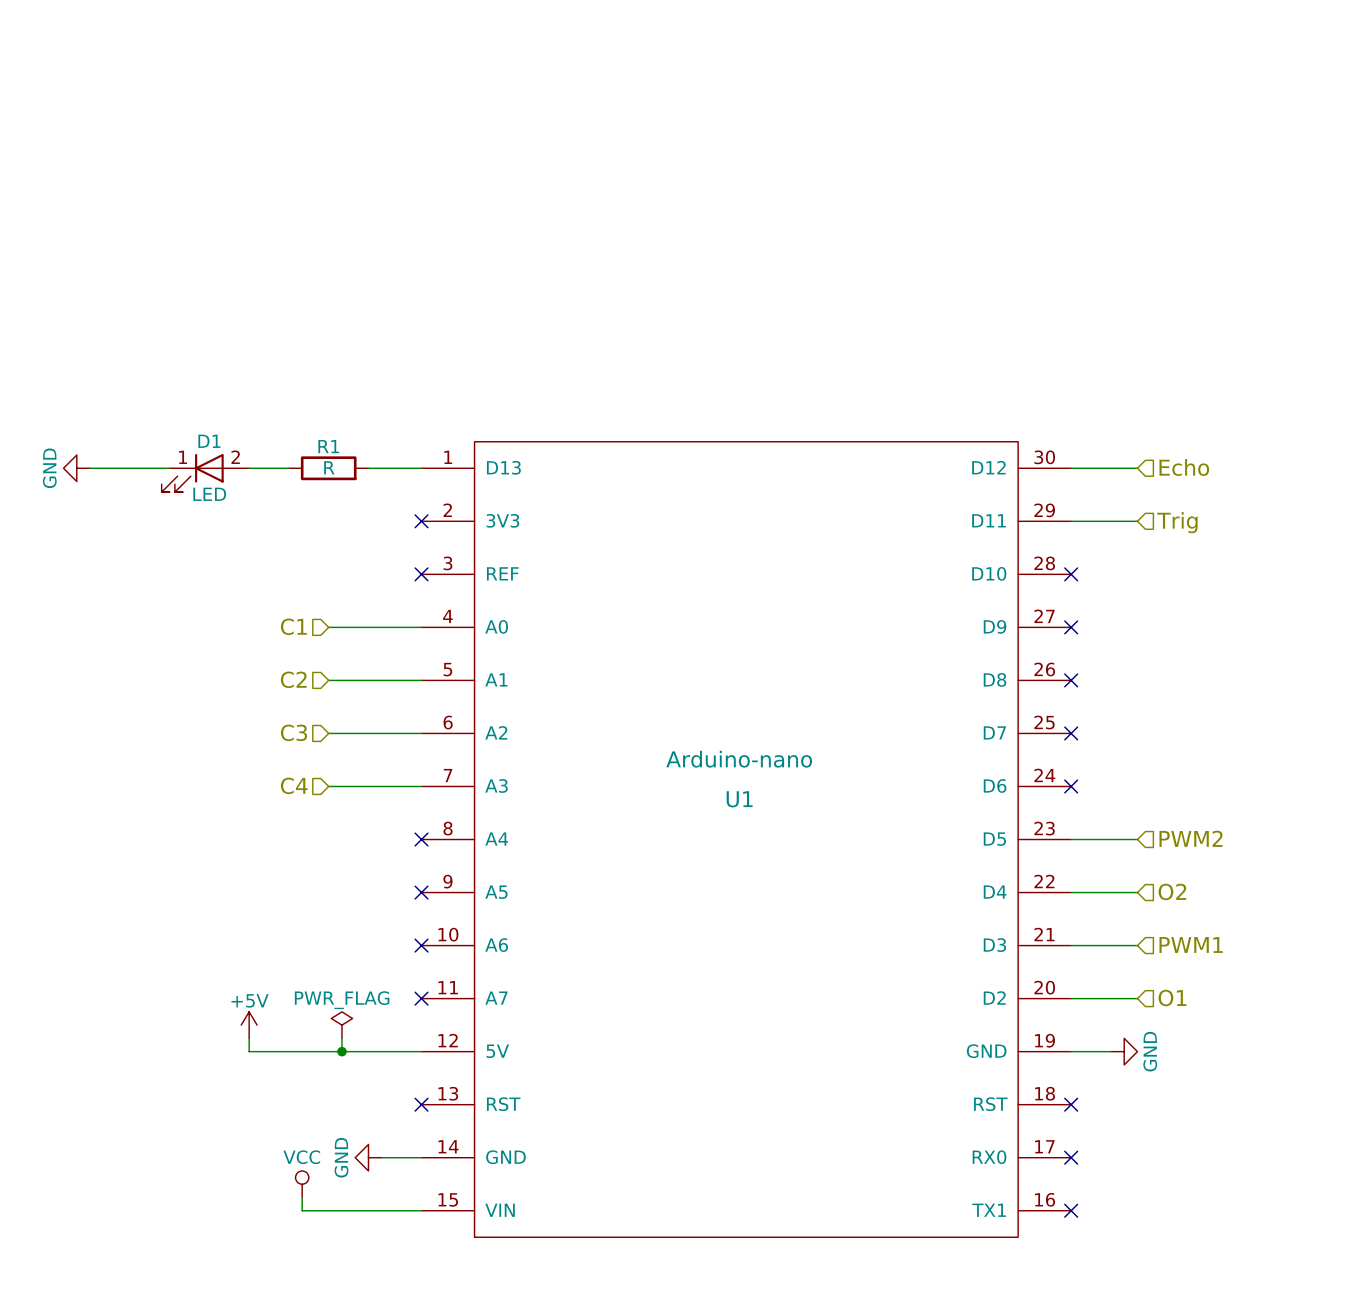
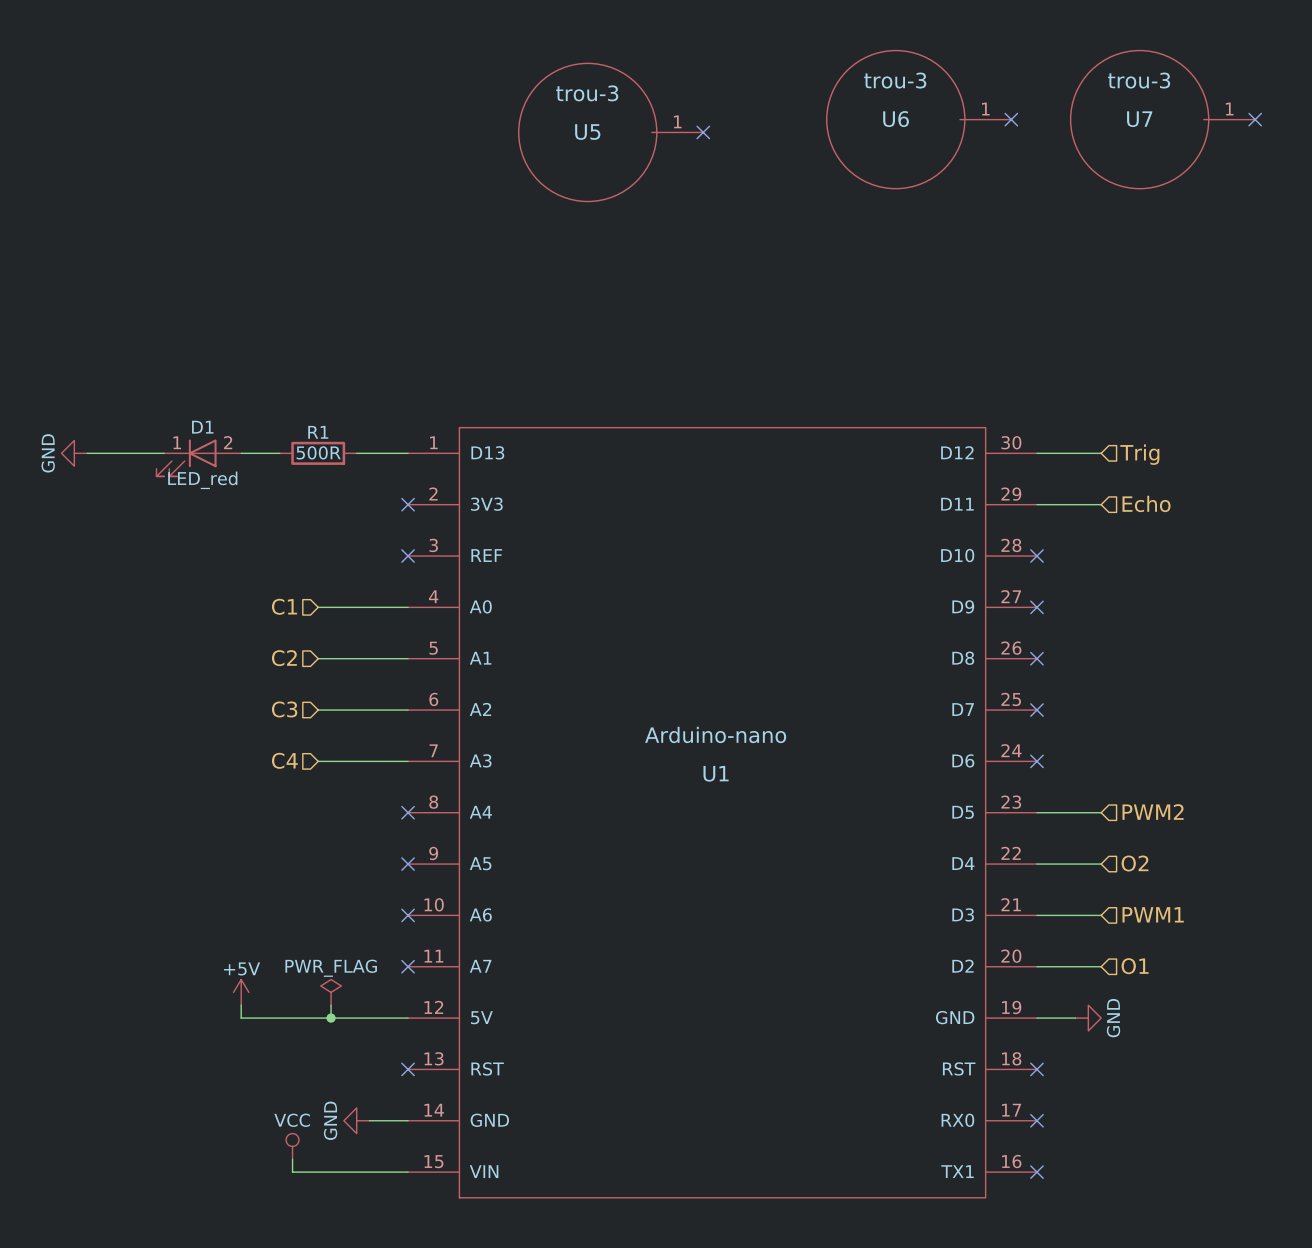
U6: none -> trou-3 (919, 119)
no-connect mark: none -> (1011, 119)
U7: none -> trou-3 (1162, 119)
no-connect mark: none -> (1255, 119)
U5: none -> trou-3 (610, 132)
no-connect mark: none -> (703, 132)
R1 value: R (329, 467) -> 500R (318, 452)
hierarchical label: Echo (1184, 467) -> Trig (1139, 454)
D1 value: LED (209, 494) -> LED_red (202, 480)
hierarchical label: Trig (1177, 522) -> Echo (1146, 503)

